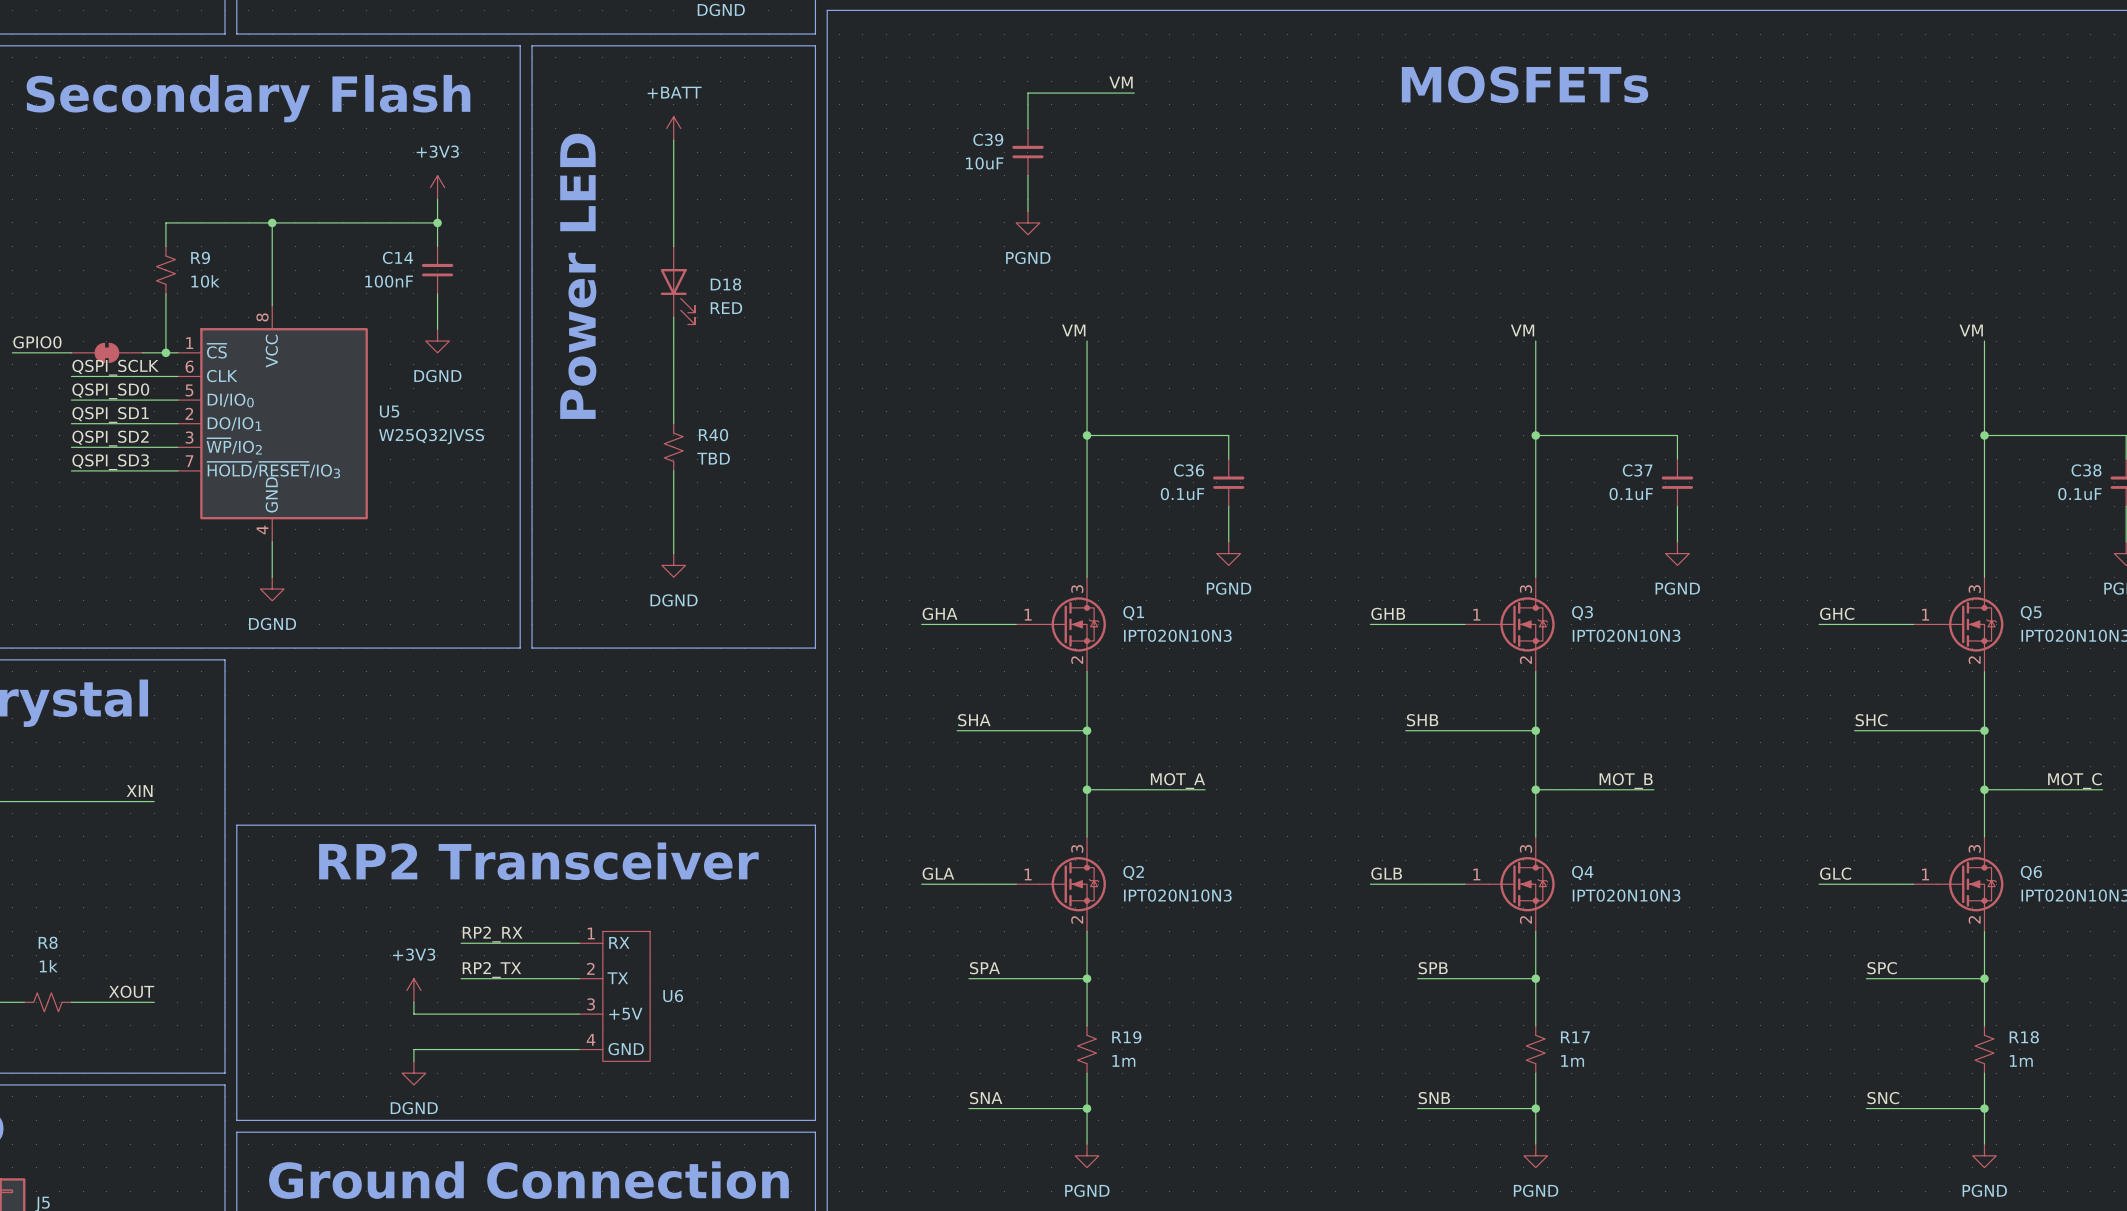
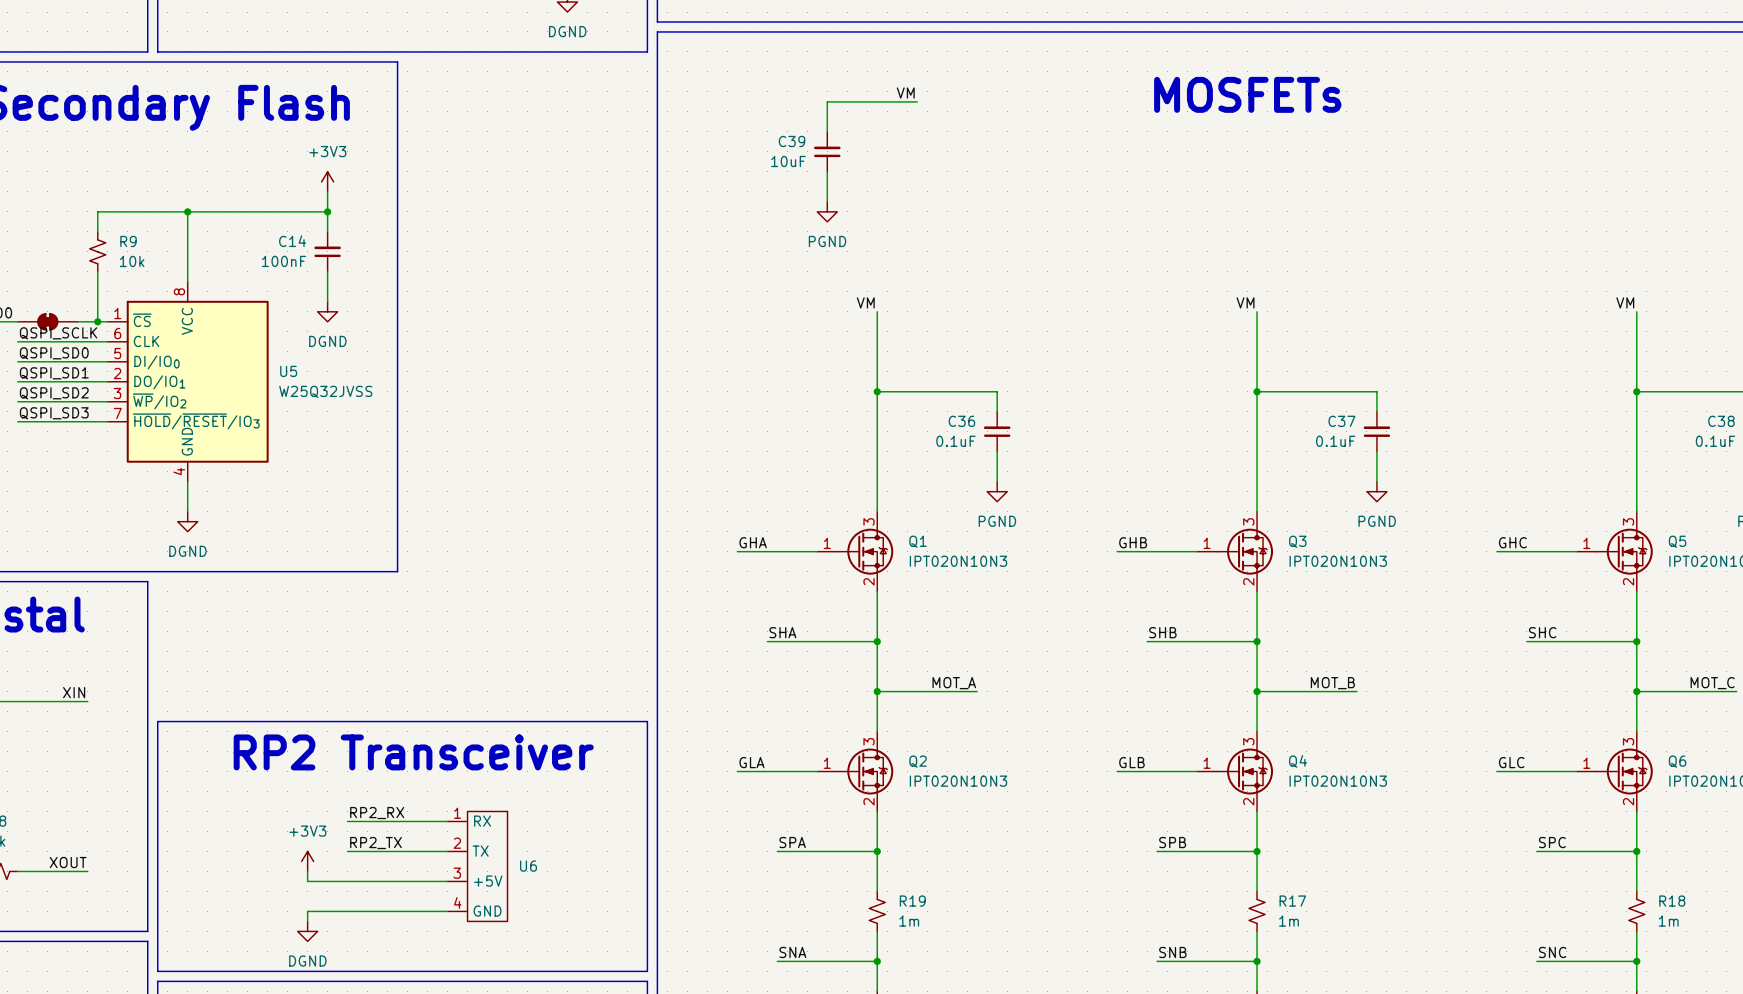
line: (532, 45) (815, 45) (815, 648) (532, 648) (532, 45) -> none
power symbol: +BATT (673, 128) -> none
wire: (673, 140) (673, 246) -> none
text: Power LED (578, 276) -> none
D18: RED (677, 285) -> none
wire: (673, 317) (673, 423) -> none
R40: TBD (673, 447) -> none
wire: (673, 470) (673, 553) -> none
power symbol: DGND (673, 565) -> none

